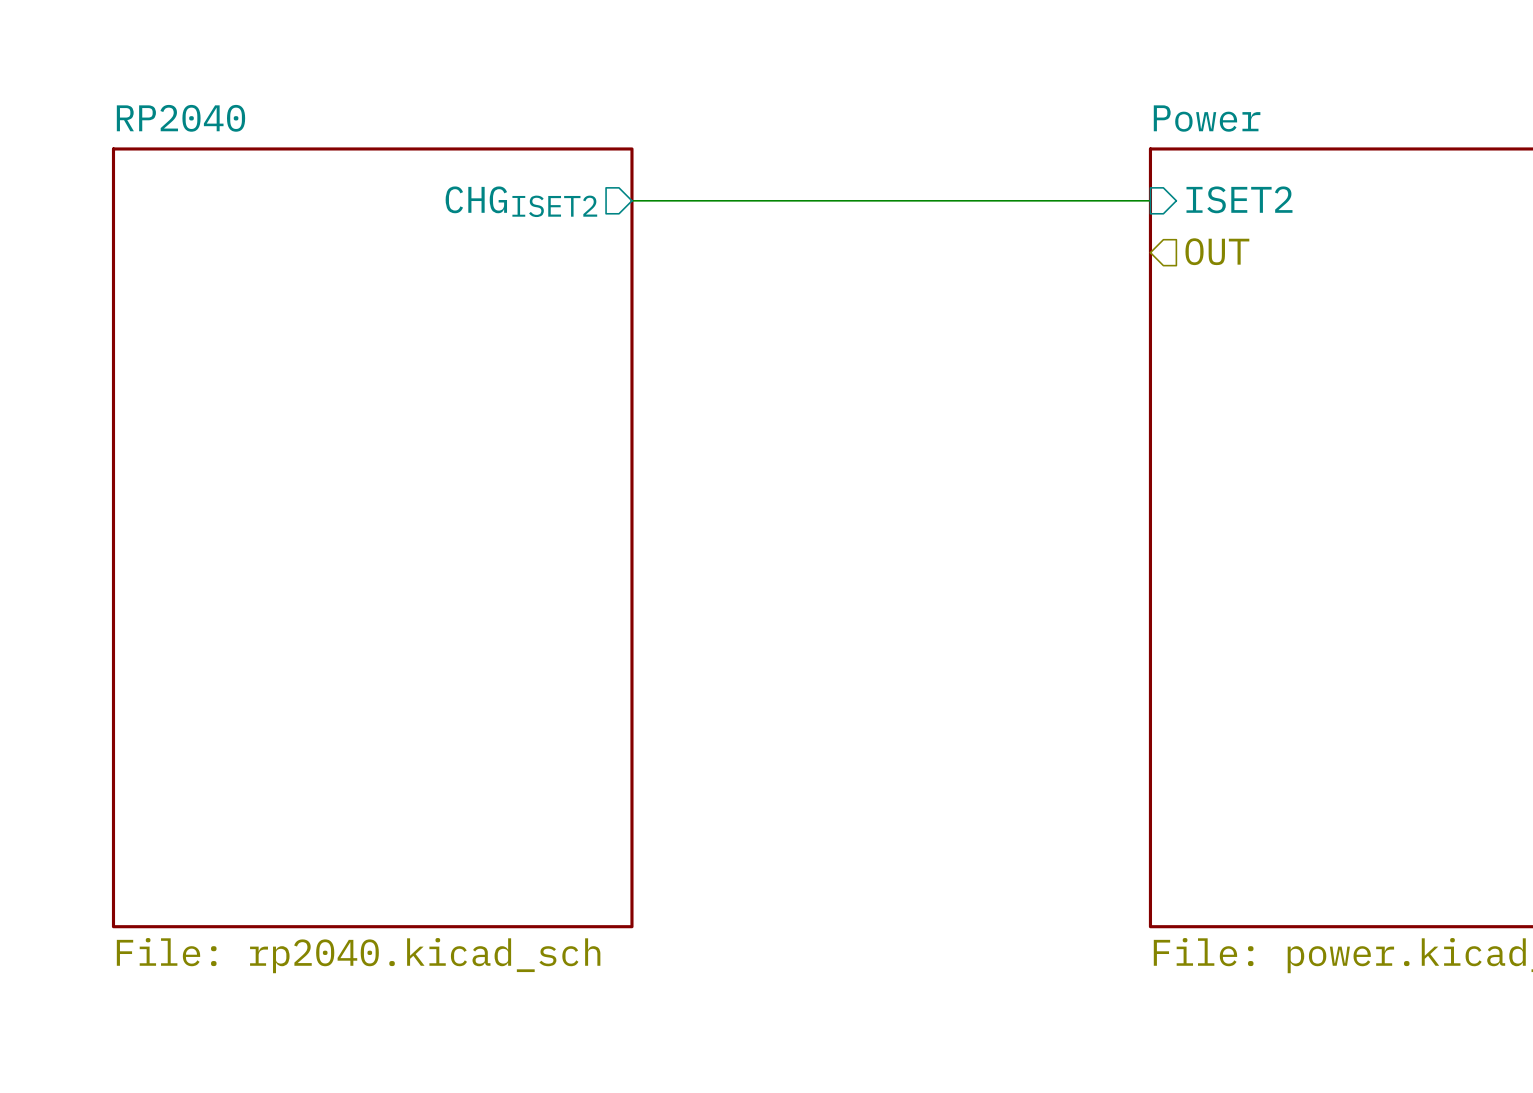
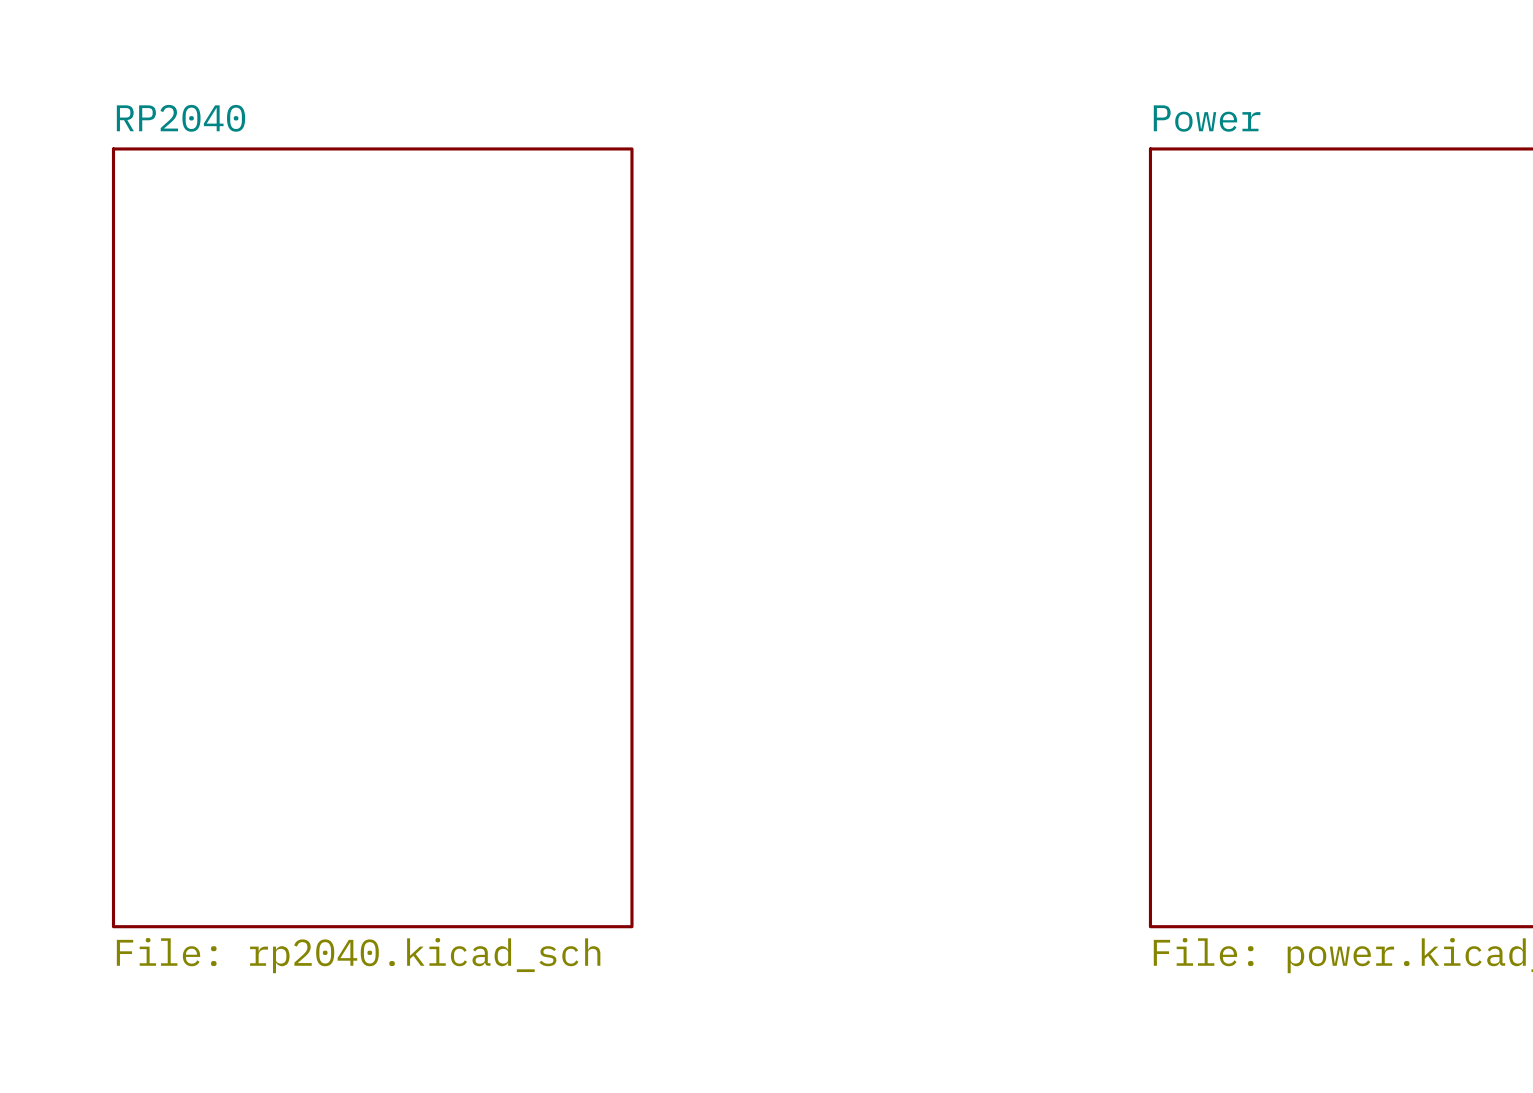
sheet pin: ISET2 (1239, 199) -> none
wire: (631, 200) (1150, 200) -> none
sheet pin: CHGISET2 (521, 201) -> none
hierarchical label: OUT (1217, 251) -> none

